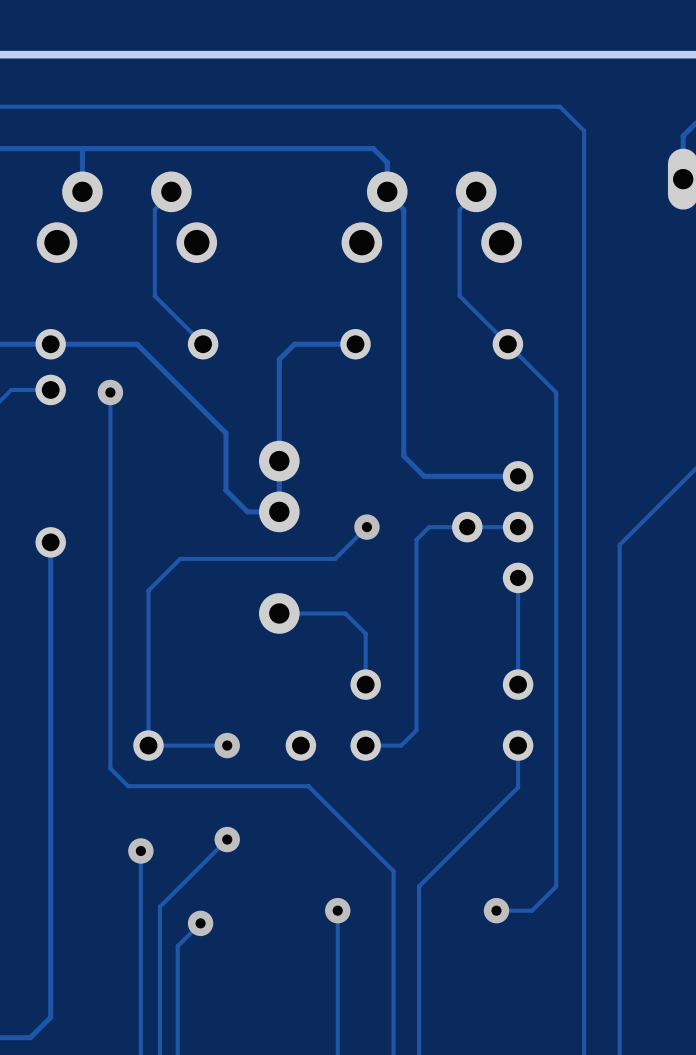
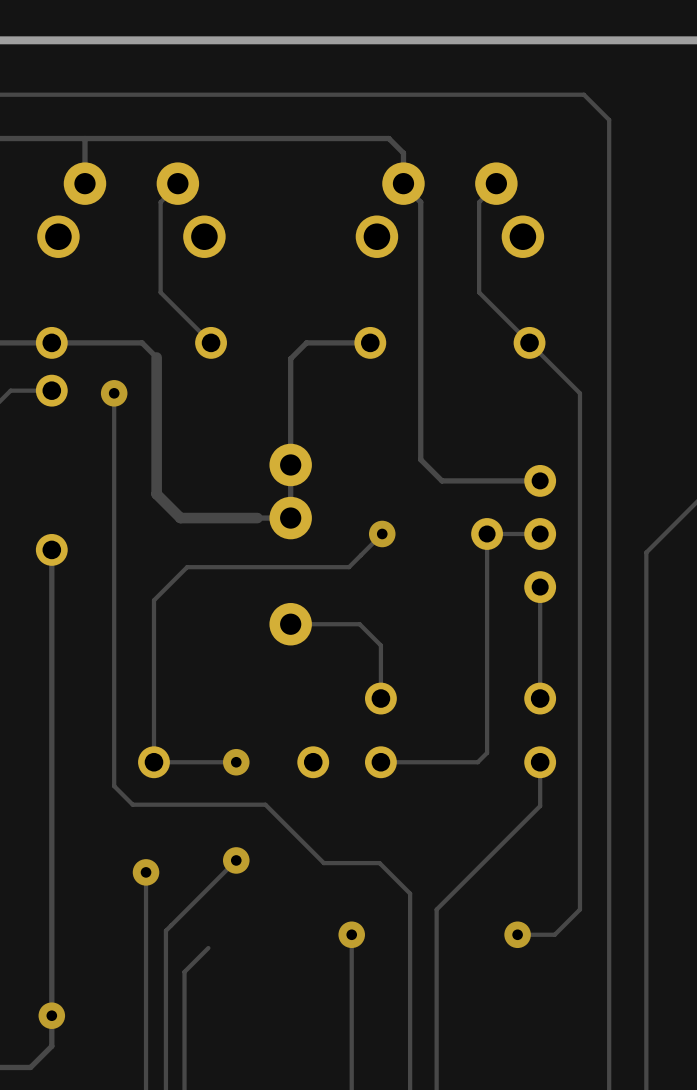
track: (151, 358) (225, 433) (225, 490) (247, 511) -> (156, 357) (156, 494) (180, 518) (257, 518)
track: (467, 527) (429, 527) (416, 539) (416, 730) (401, 745) -> (487, 533) (487, 752) (477, 762) (418, 762)
track: (255, 786) (308, 786) (364, 842) -> (265, 804) (323, 863) (379, 863)
via: (200, 923) -> none
via: none -> (51, 1015)

